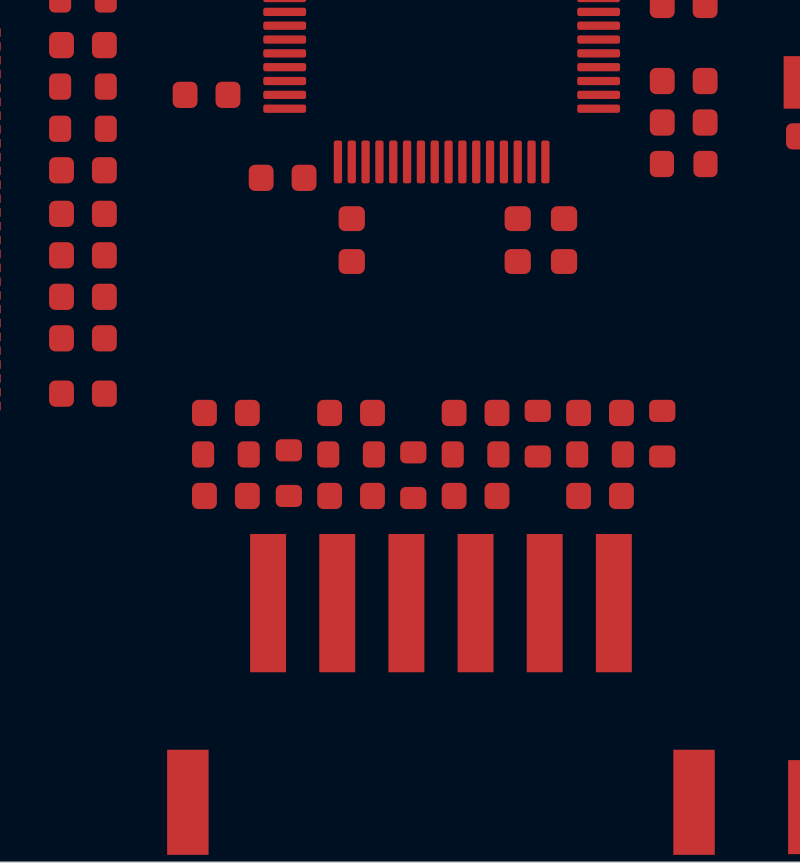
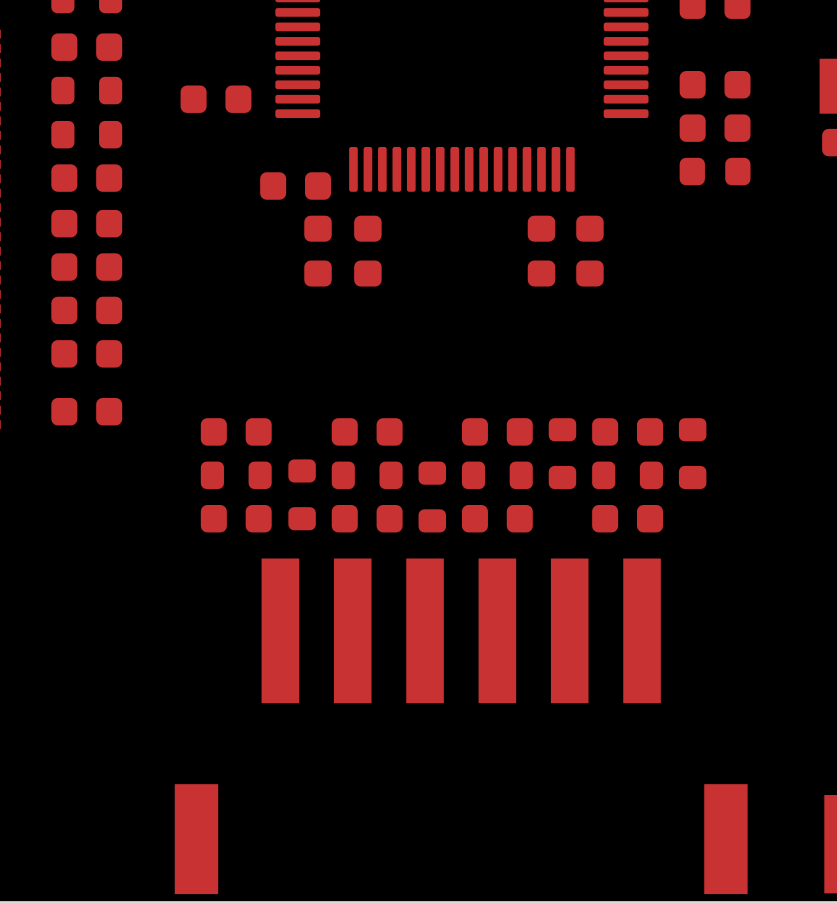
part: none -> (318, 251)

